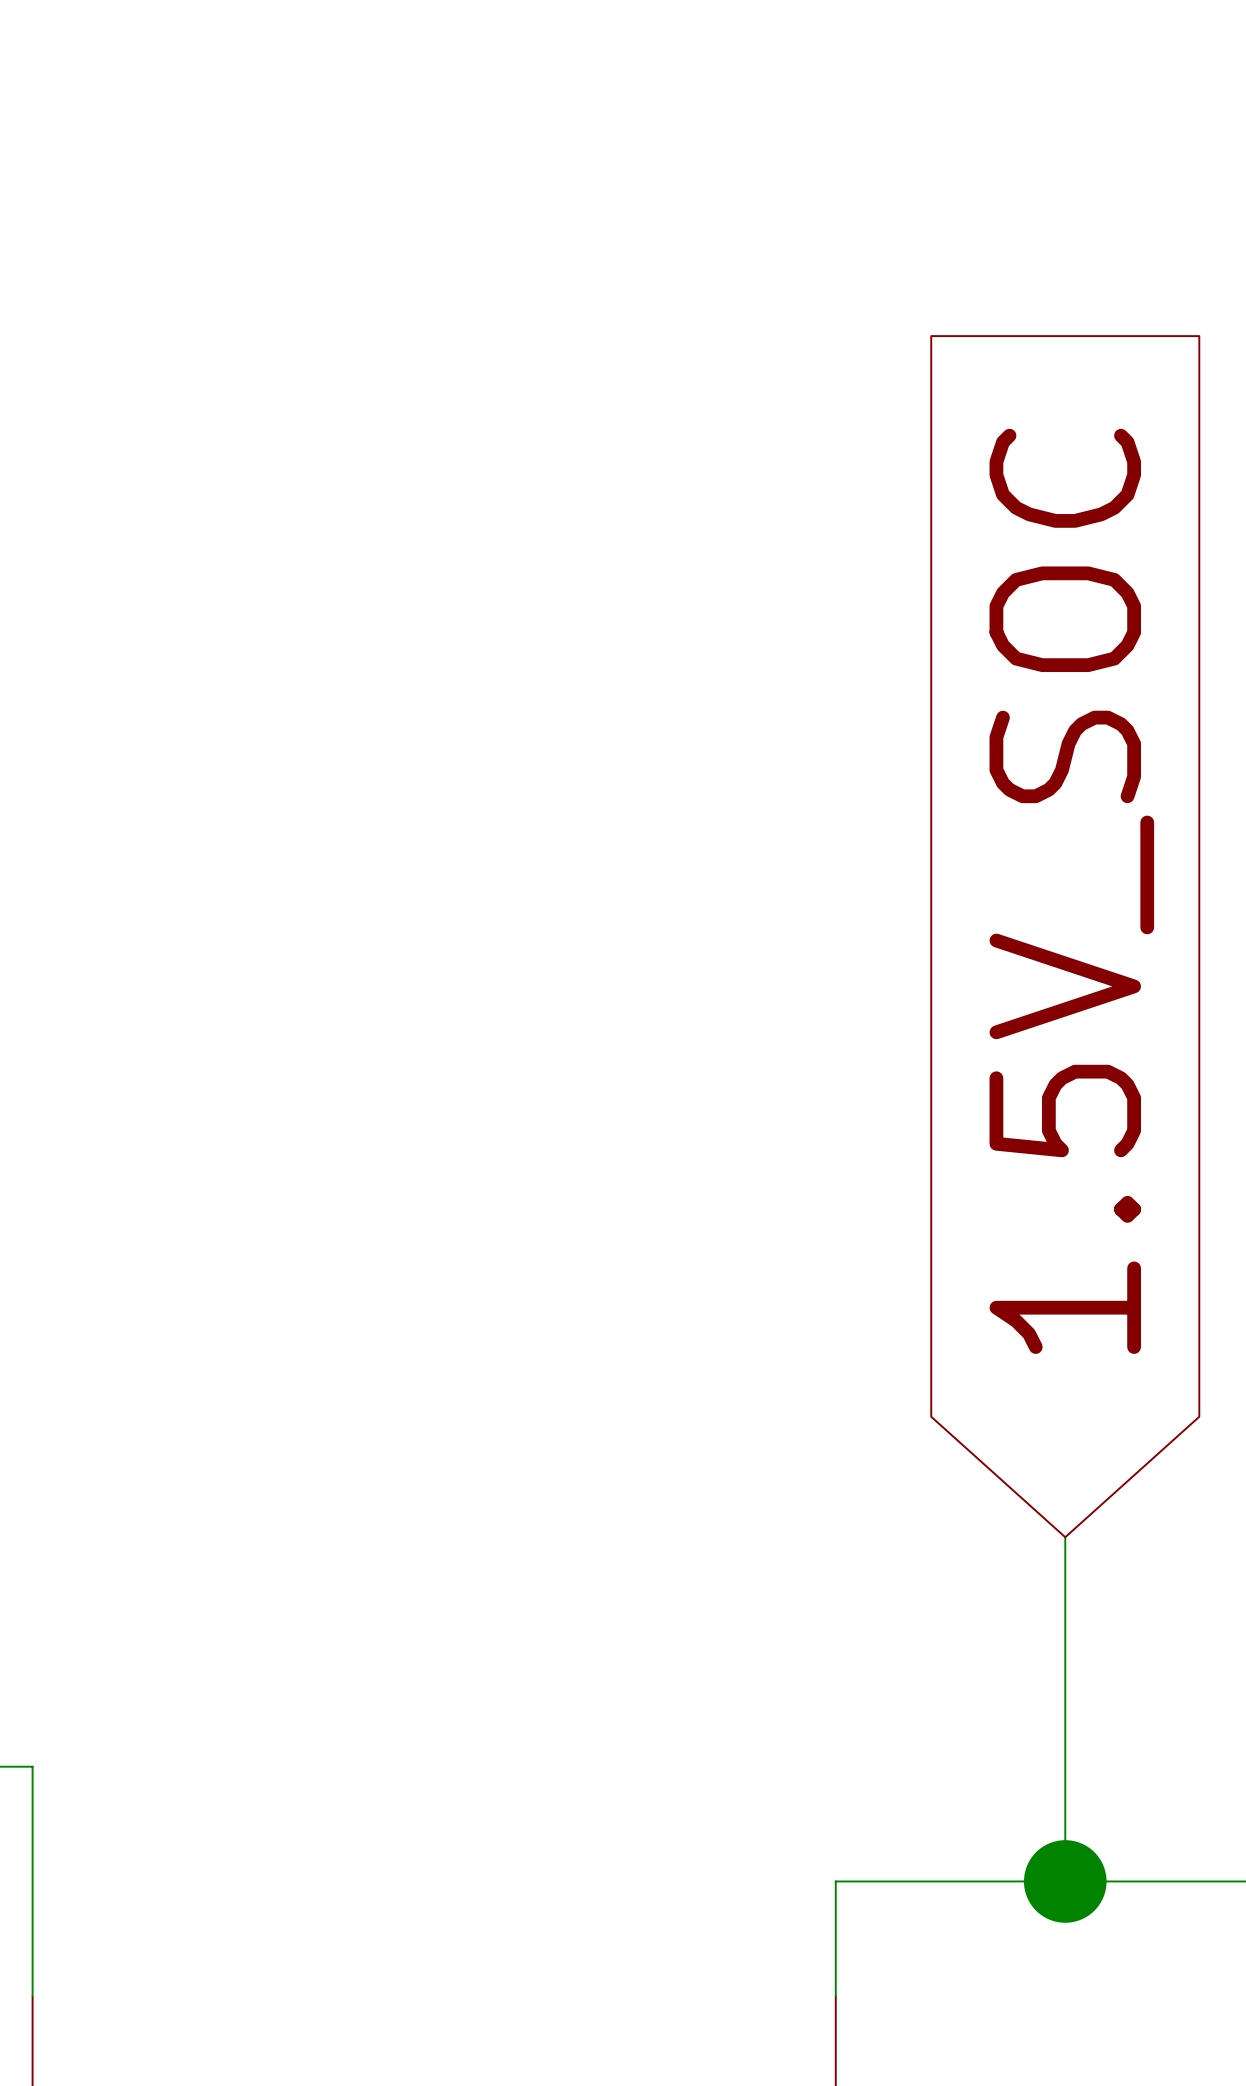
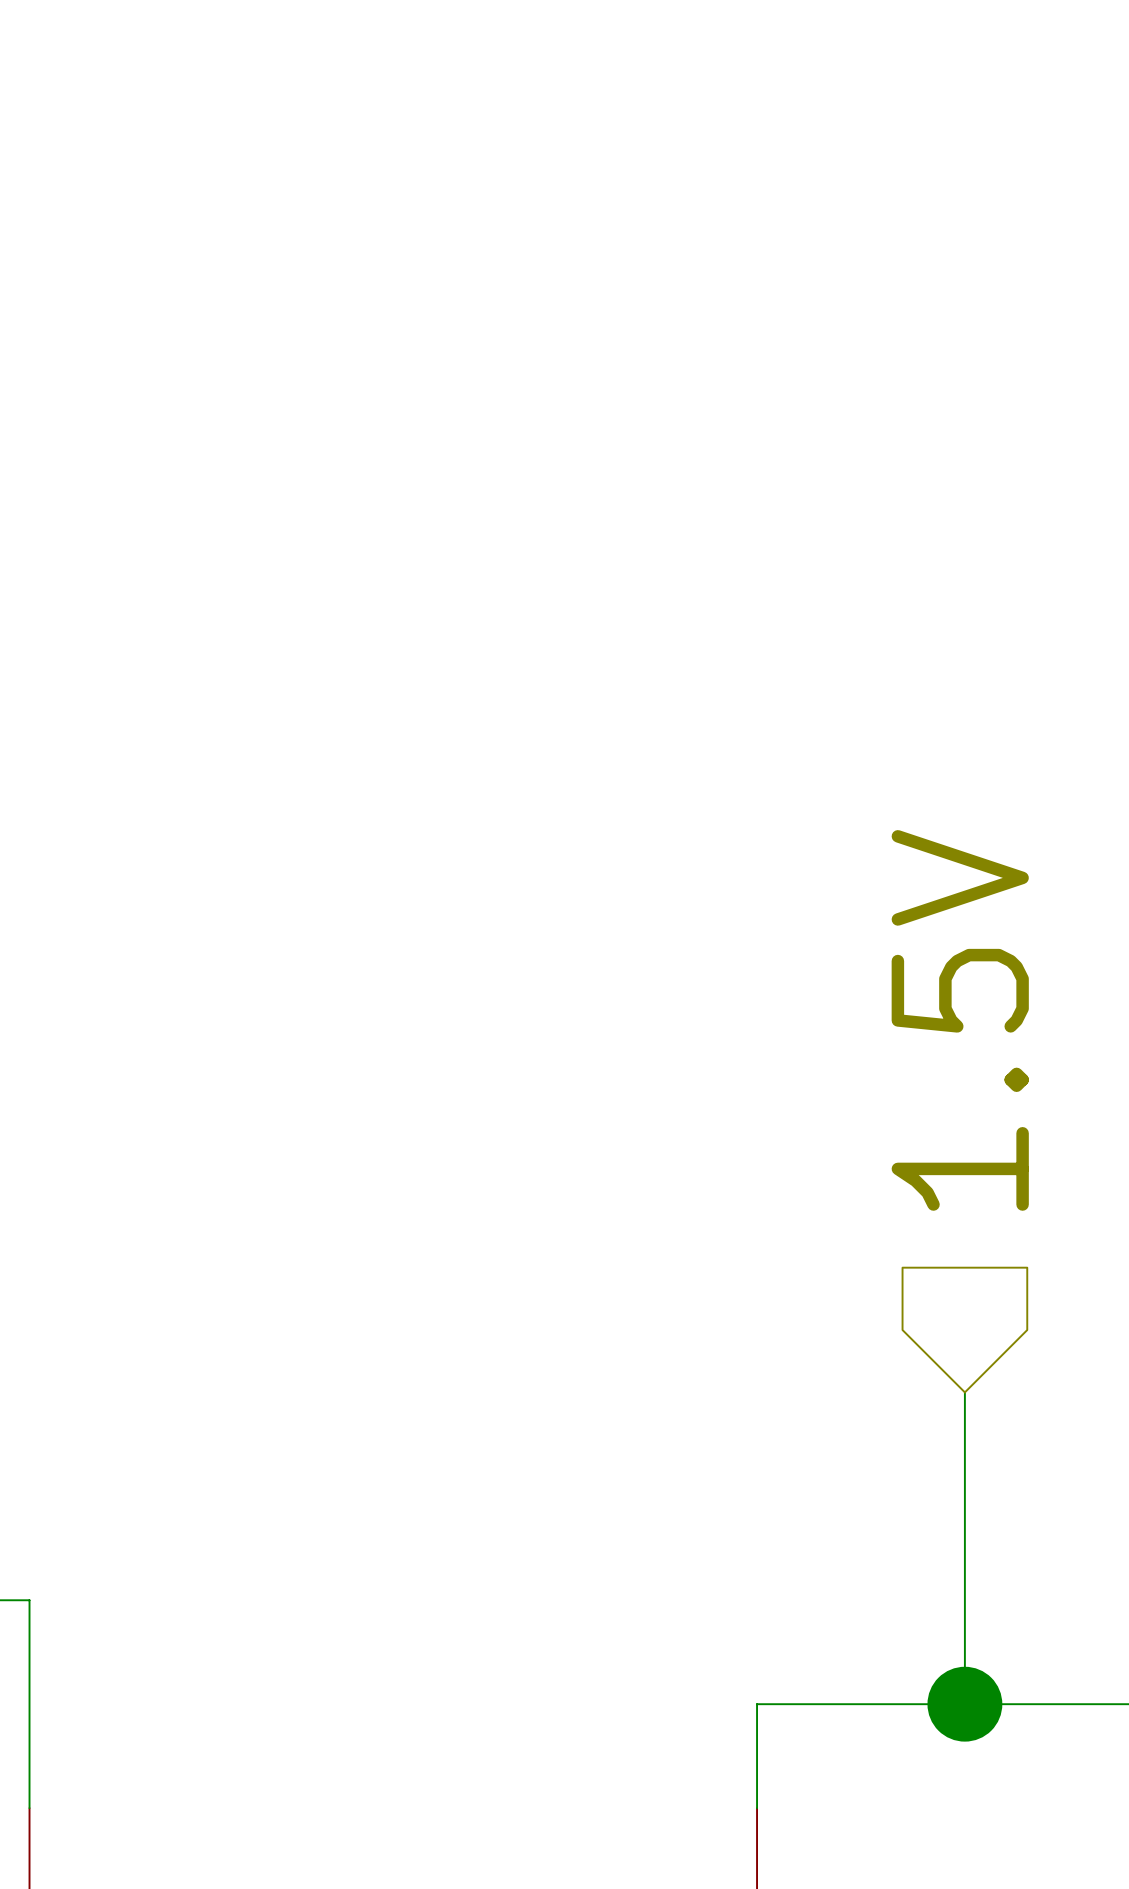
global label: 1.5V_SOC (1071, 891) -> none
hierarchical label: none -> 1.5V (960, 1020)

